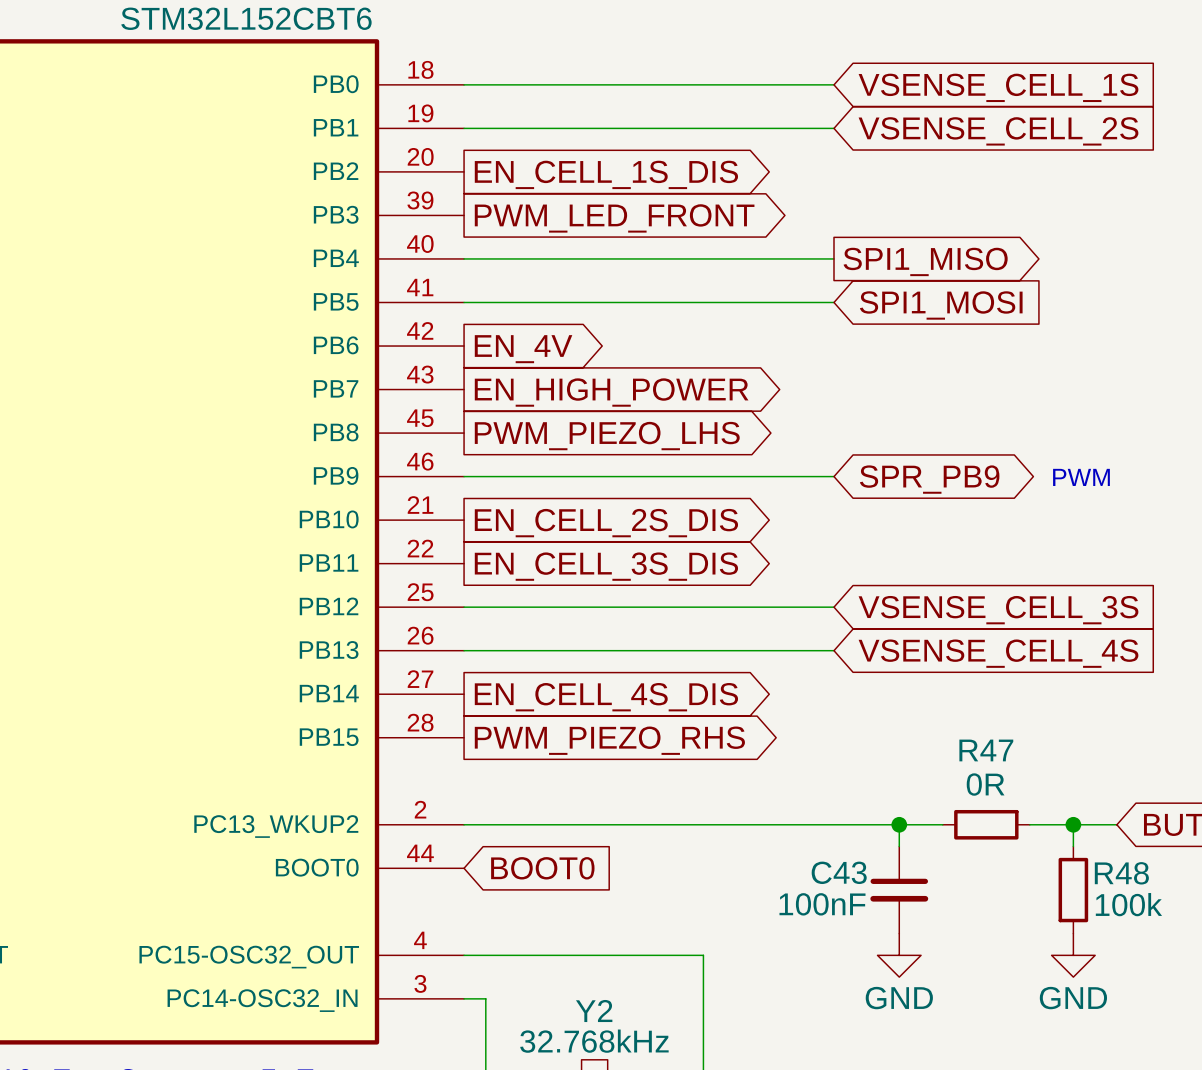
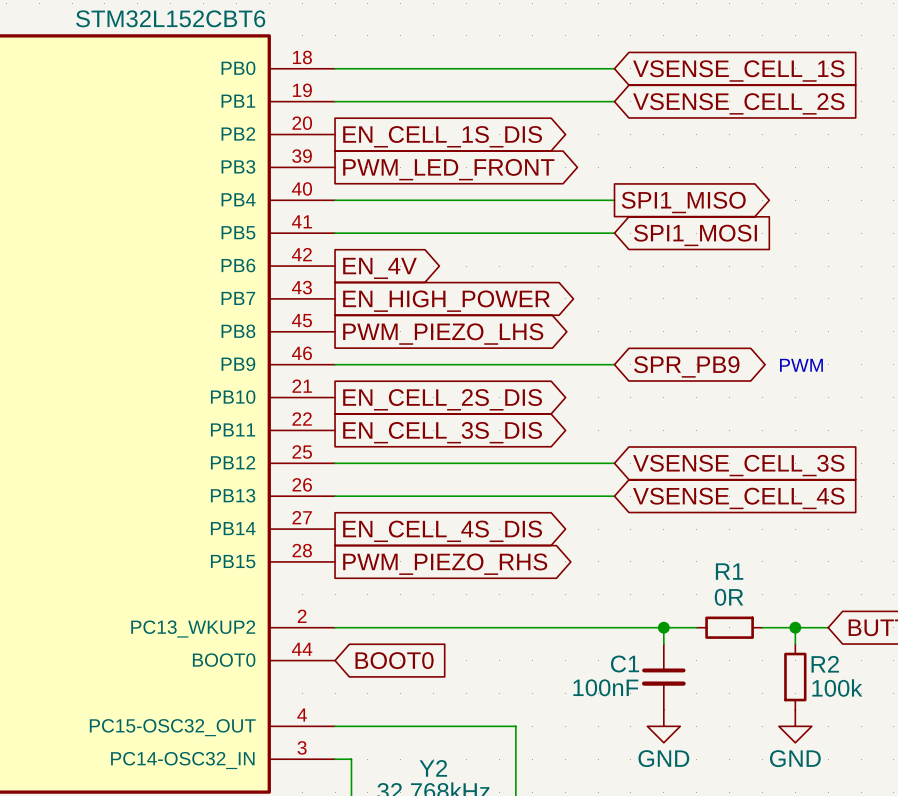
R47 name: R47 (986, 750) -> R1 (729, 571)
C43 name: C43 (839, 872) -> C1 (625, 663)
R48 name: R48 (1121, 873) -> R2 (825, 664)

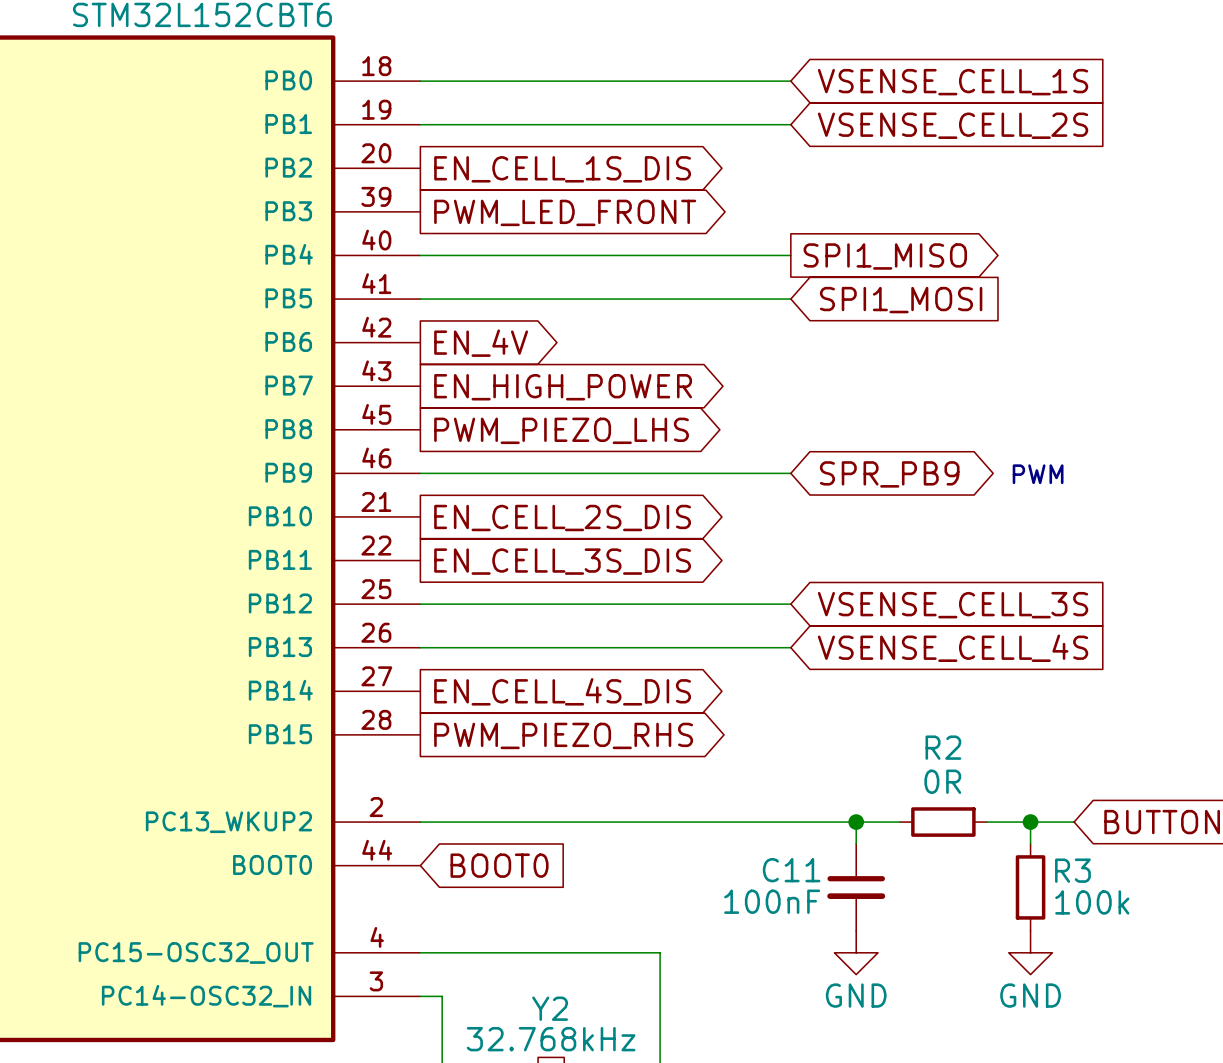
R1 name: R1 (729, 571) -> R2 (943, 747)
C1 name: C1 (625, 663) -> C11 (791, 870)
R2 name: R2 (825, 664) -> R3 (1072, 870)

